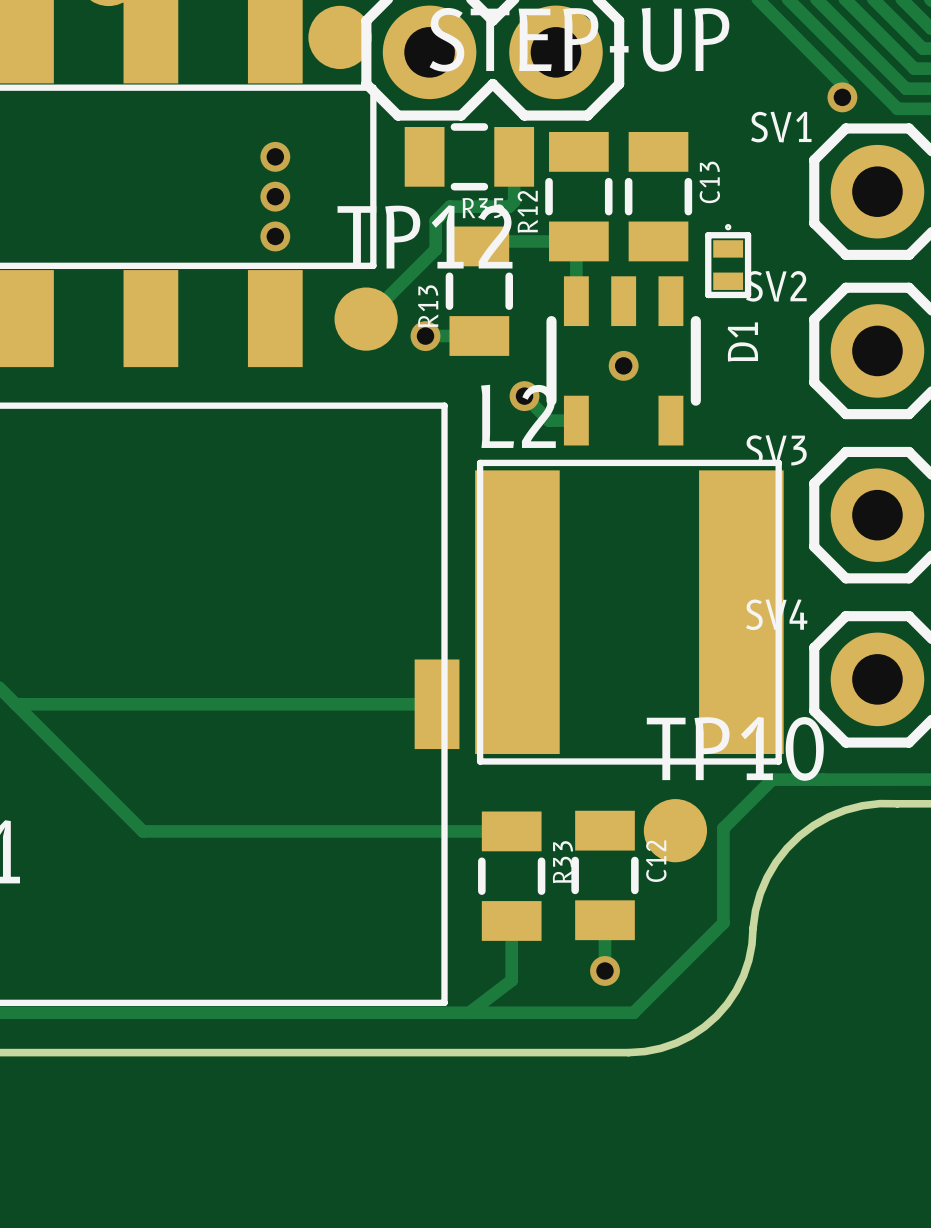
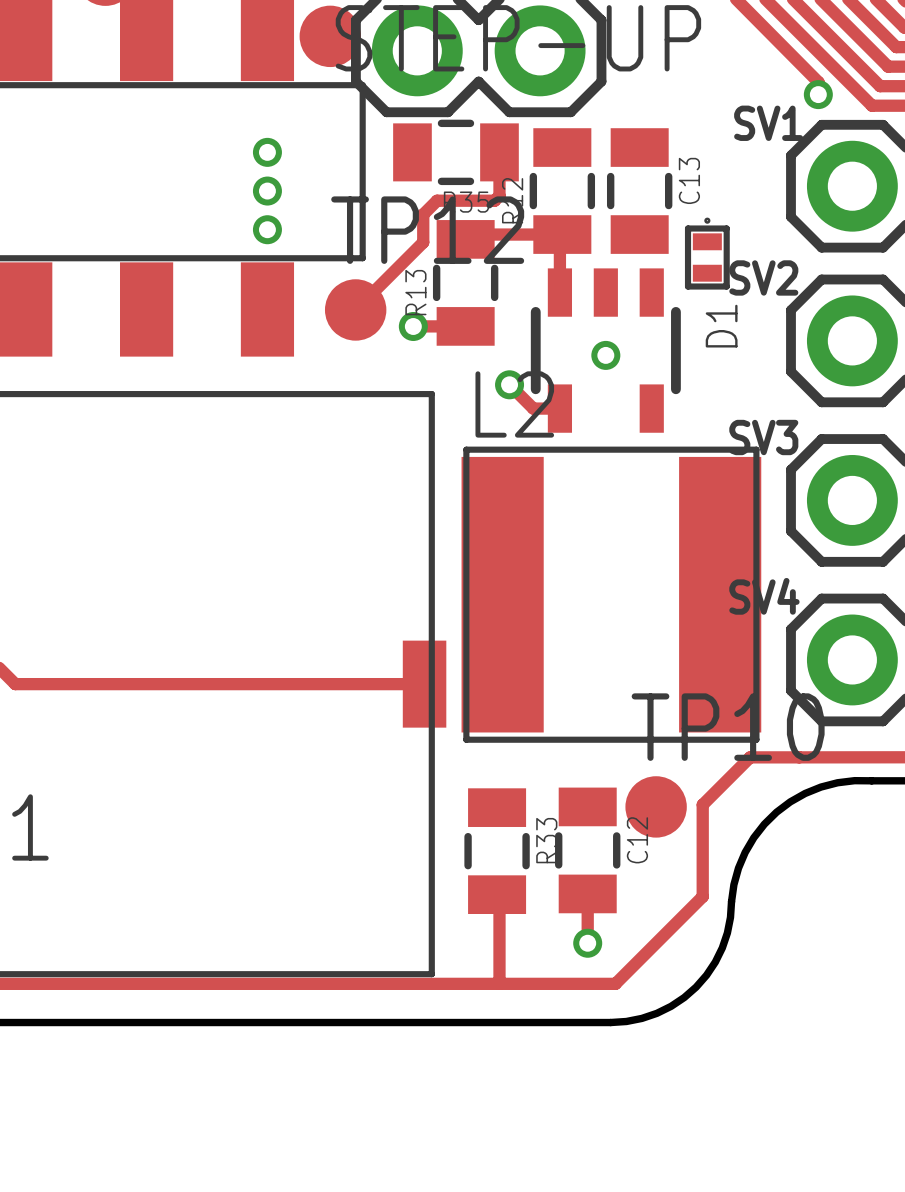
track: (15, 704) (142, 831) (511, 831) -> none
track: (511, 920) (511, 980) (469, 1012) -> (497, 894) (499, 897) (499, 983)

